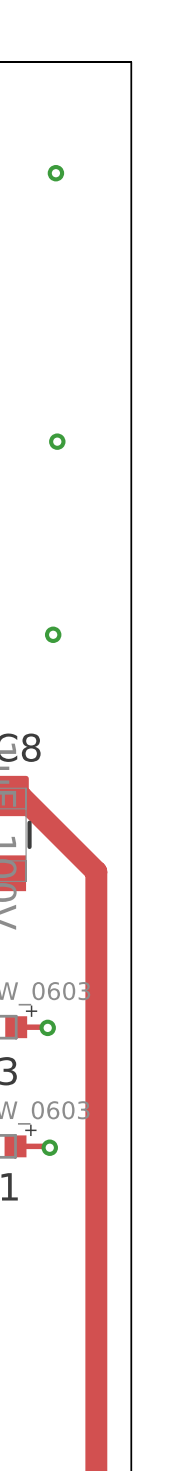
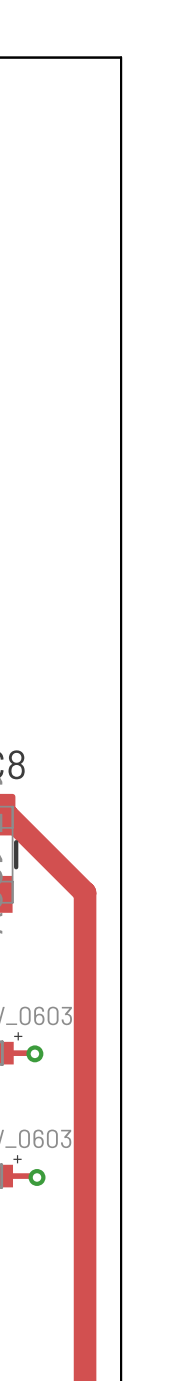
via: (55, 173) -> none
via: (57, 441) -> none
via: (53, 634) -> none

